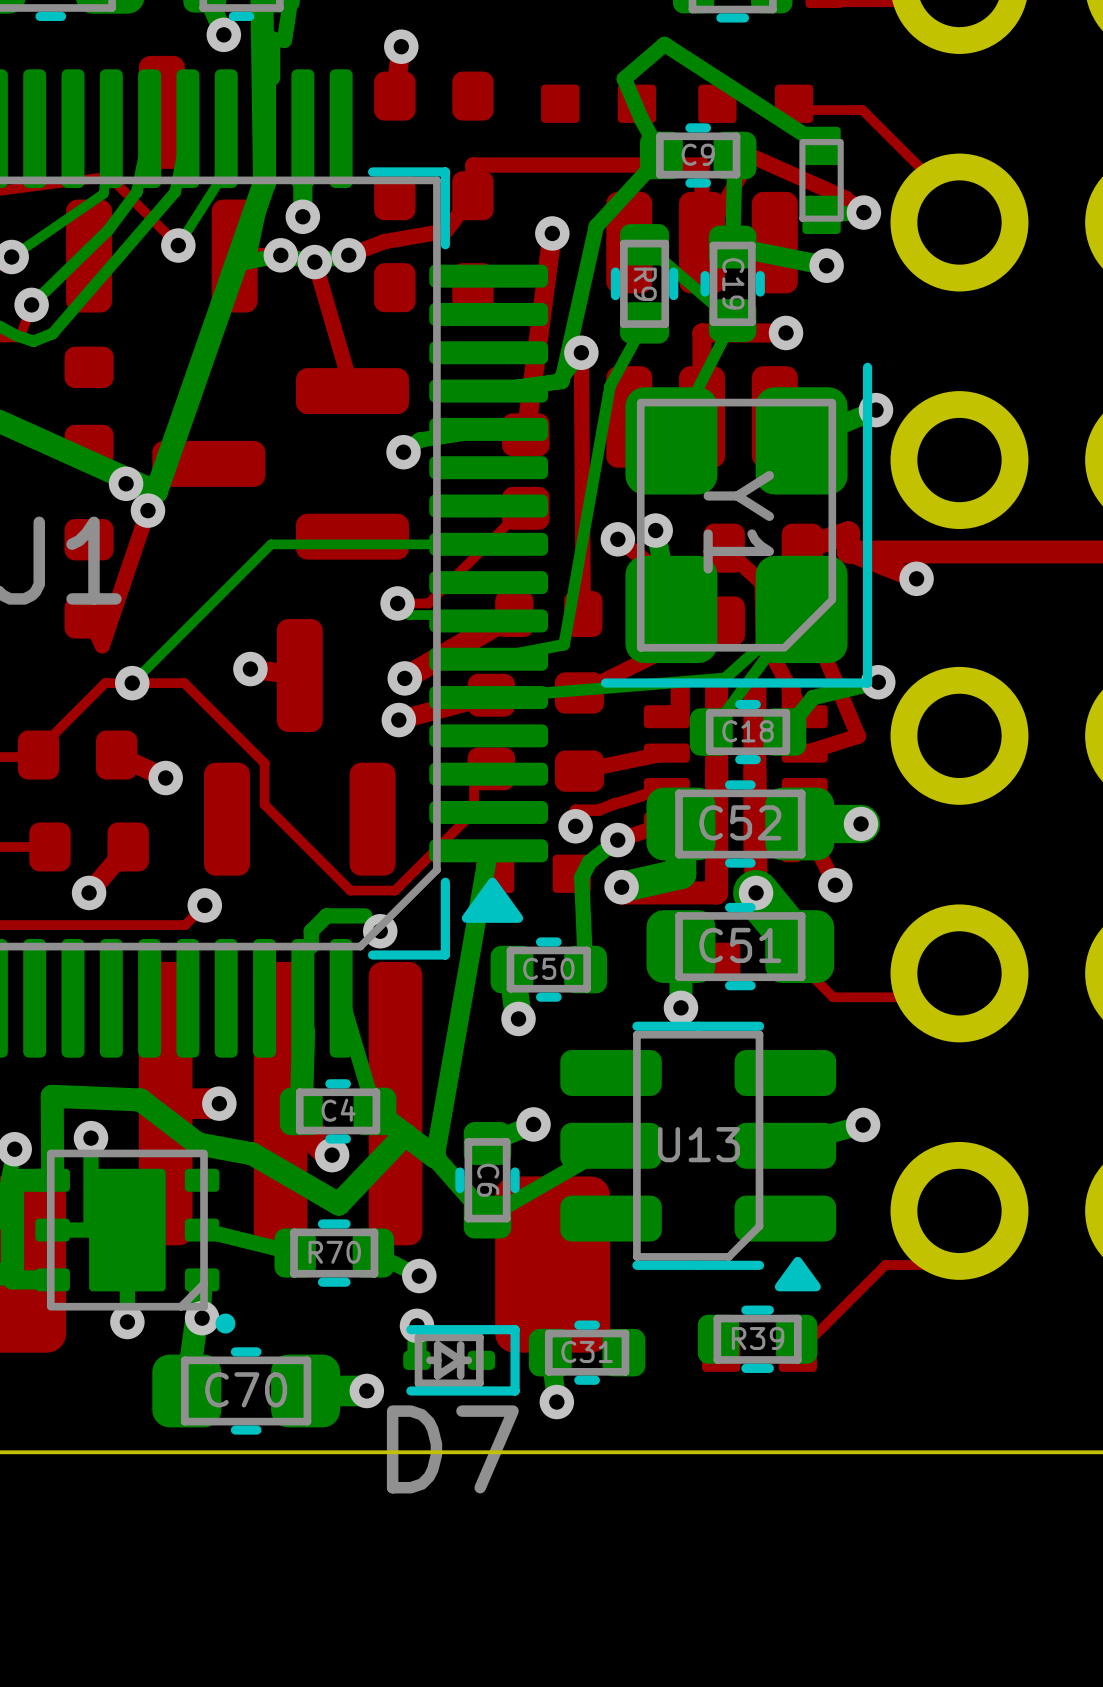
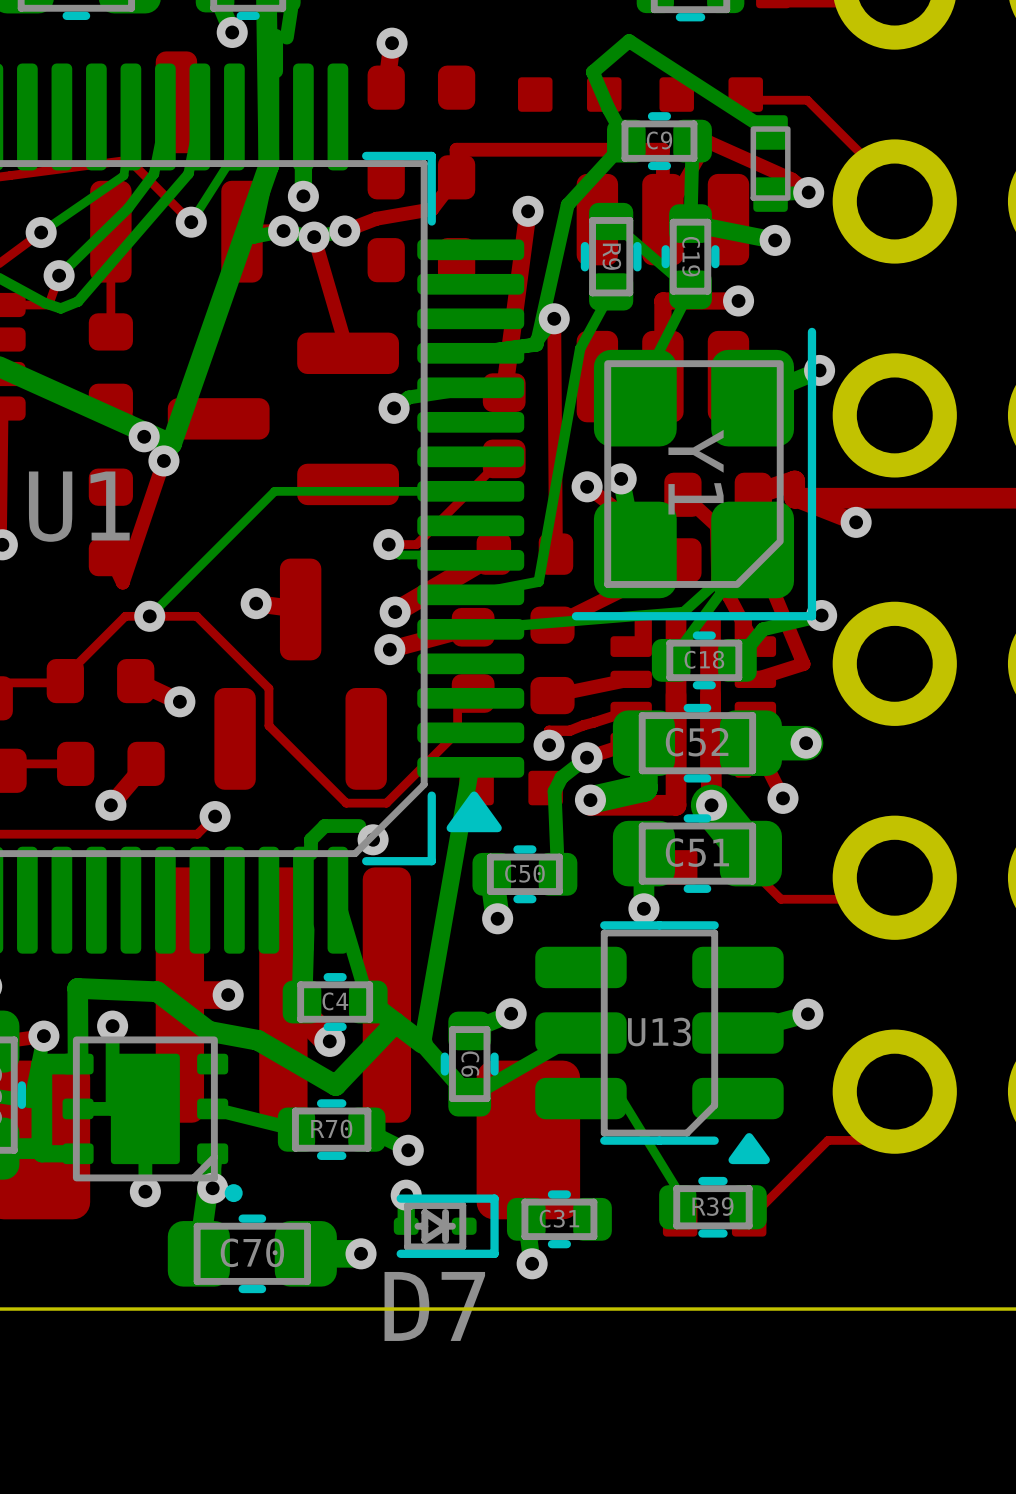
top track: none -> (110, 277) (110, 318)
bottom track: none -> (621, 1098) (677, 1190)

